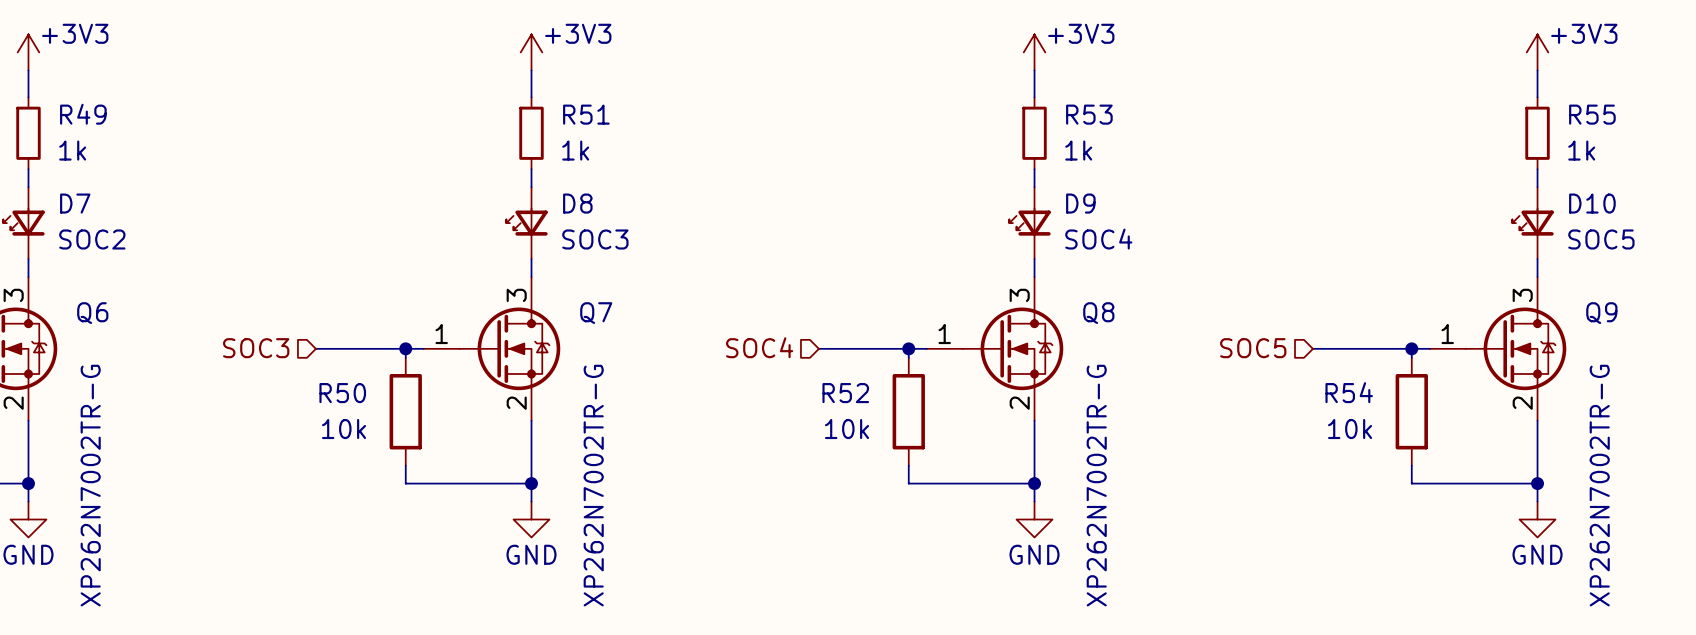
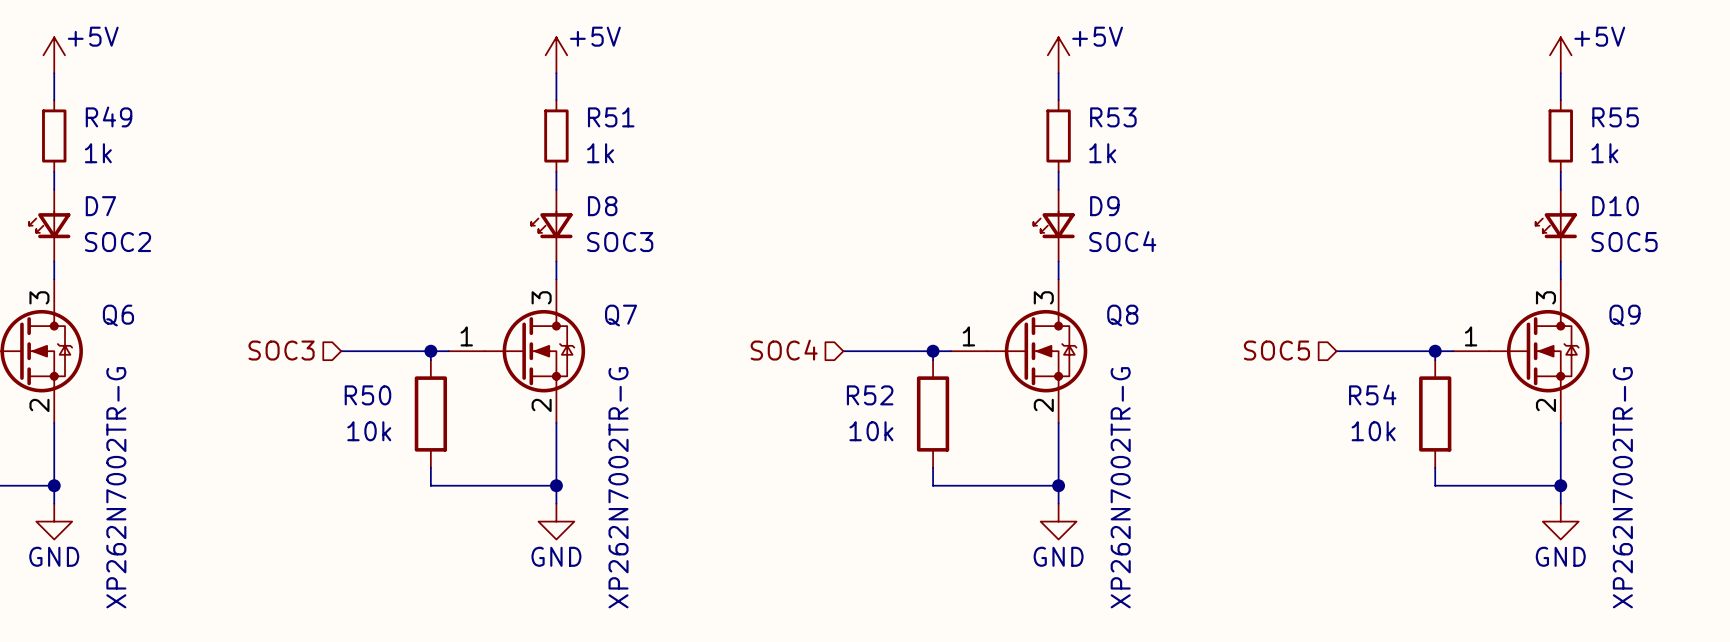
power symbol: +3V3 (28, 52) -> +5V (54, 55)
power symbol: +3V3 (531, 52) -> +5V (556, 55)
power symbol: +3V3 (1034, 52) -> +5V (1058, 55)
power symbol: +3V3 (1537, 52) -> +5V (1560, 55)

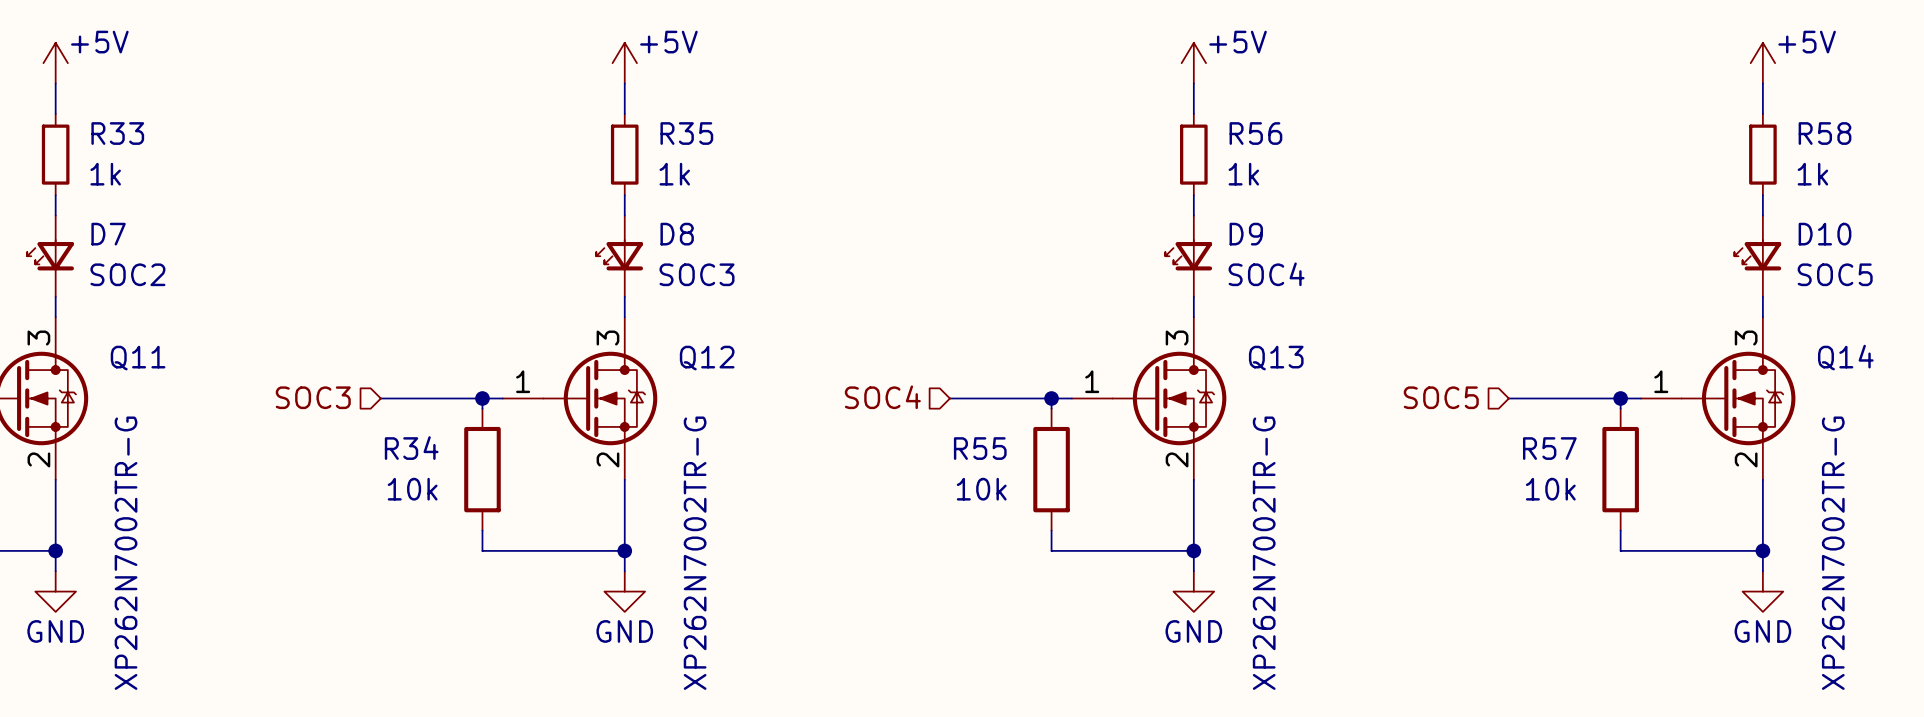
R49 name: R49 (109, 116) -> R33 (117, 133)
R51 name: R51 (611, 117) -> R35 (686, 133)
R53 name: R53 (1113, 117) -> R56 (1255, 133)
R55 name: R55 (1615, 117) -> R58 (1825, 133)
Q6 name: Q6 (118, 315) -> Q11 (138, 358)
Q7 name: Q7 (621, 315) -> Q12 (707, 358)
Q8 name: Q8 (1122, 315) -> Q13 (1276, 358)
Q9 name: Q9 (1624, 315) -> Q14 (1845, 357)
R54 name: R54 (1372, 394) -> R57 (1549, 448)
R50 name: R50 (367, 395) -> R34 (411, 448)
R52 name: R52 (870, 395) -> R55 (980, 448)

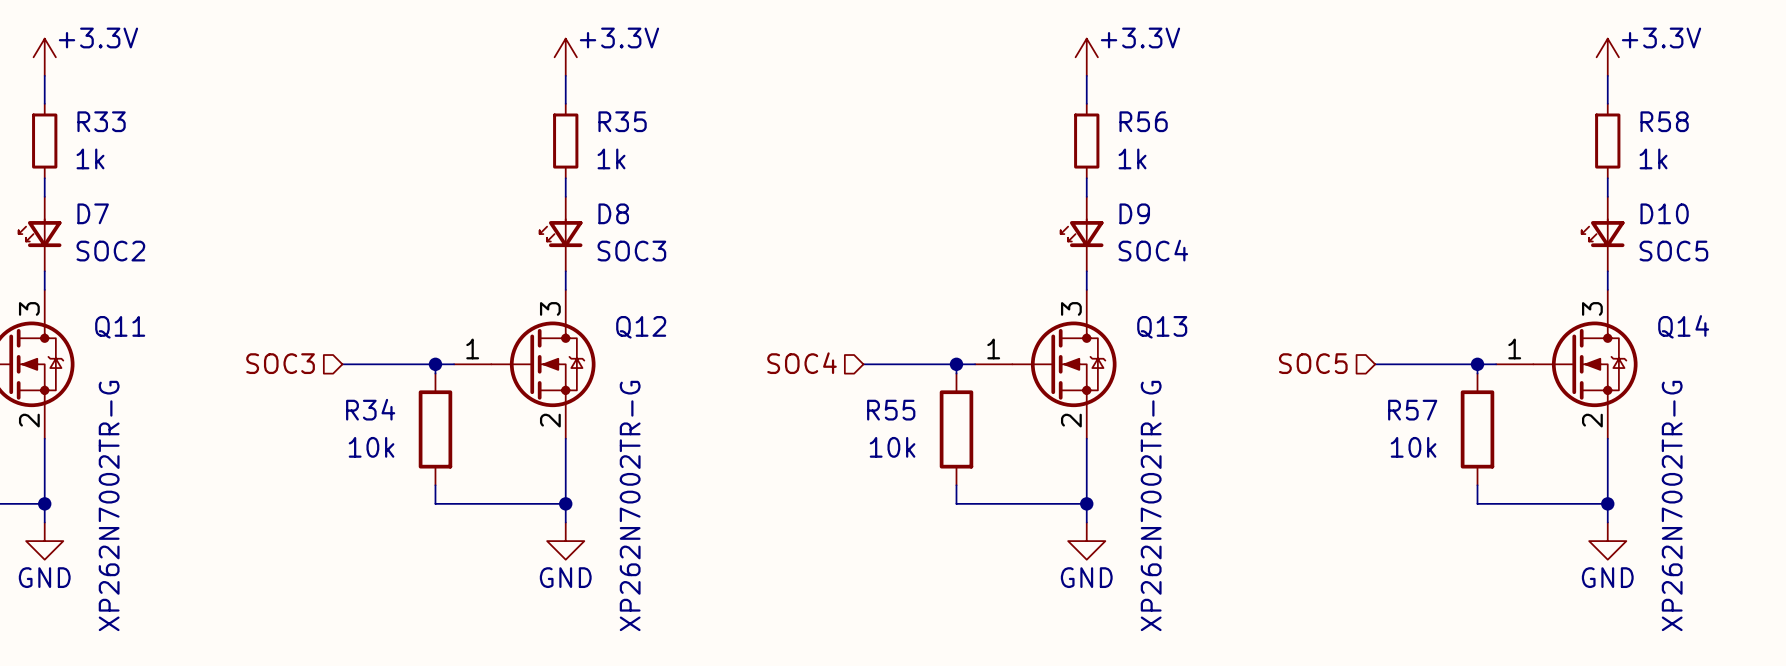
power symbol: +5V (55, 63) -> +3.3V (44, 57)
power symbol: +5V (624, 63) -> +3.3V (565, 57)
power symbol: +5V (1193, 63) -> +3.3V (1086, 57)
power symbol: +5V (1762, 63) -> +3.3V (1607, 57)

